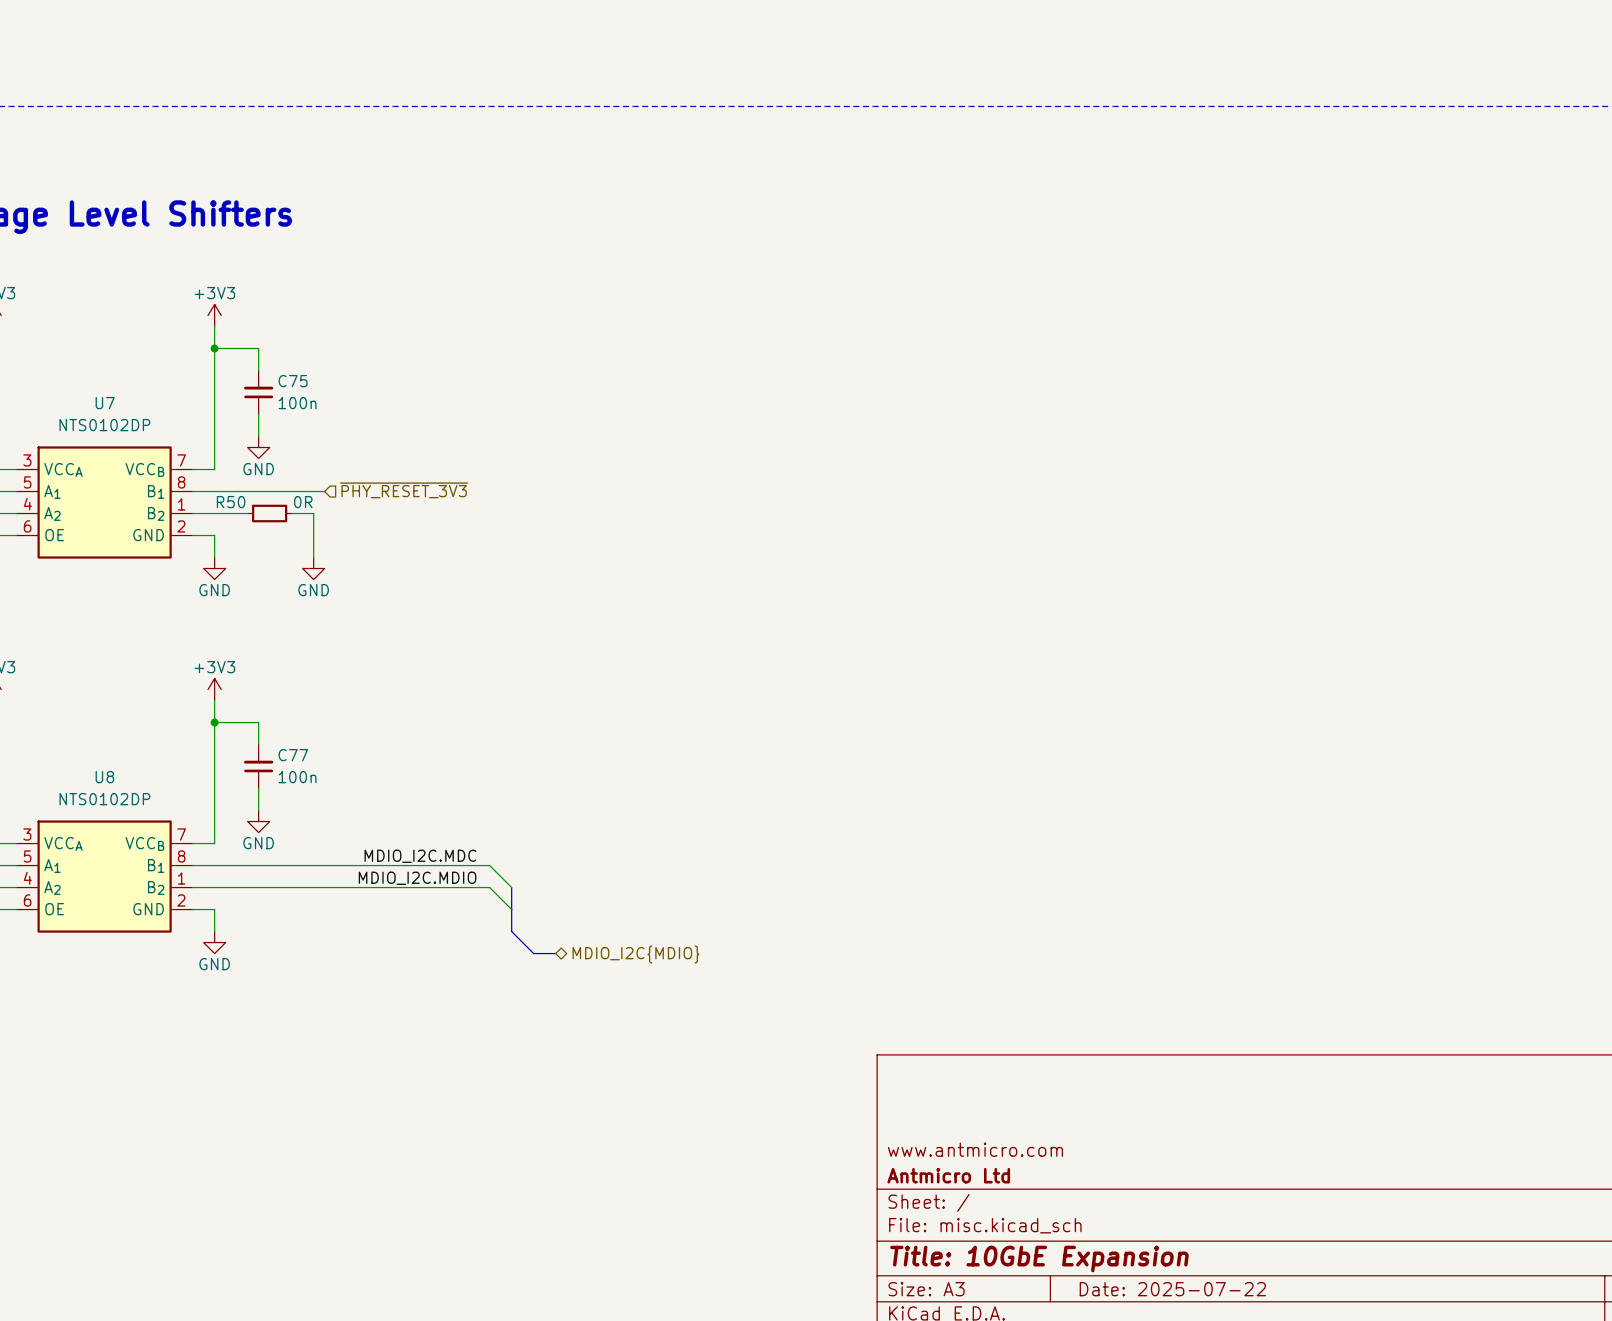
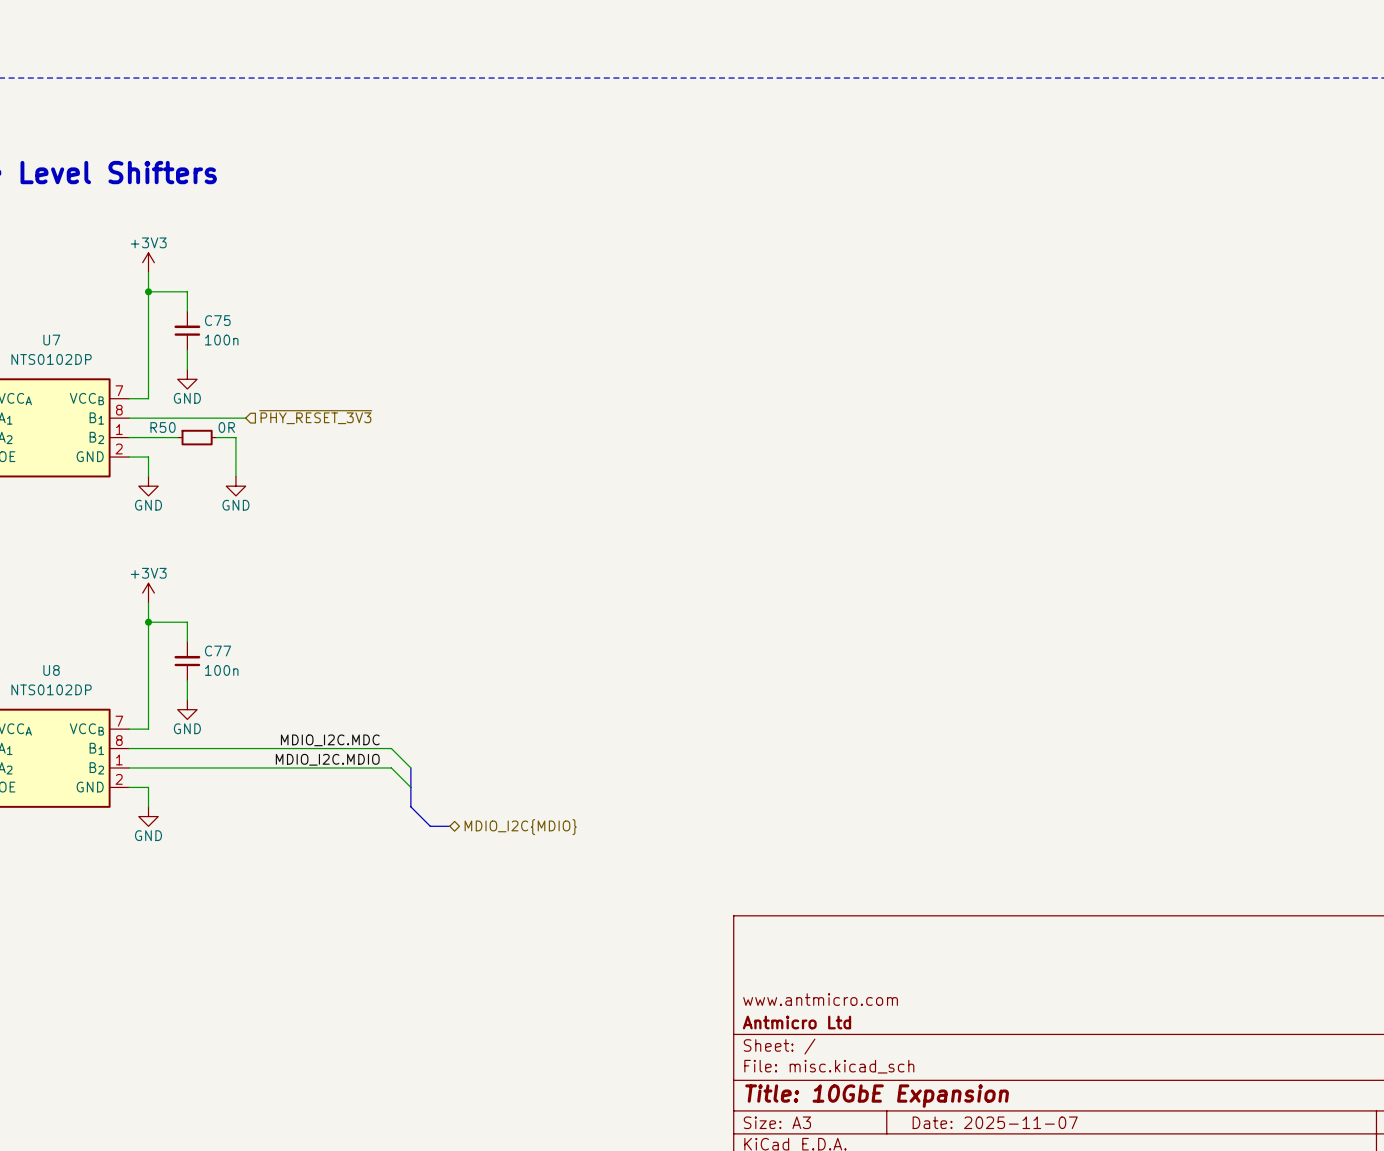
title block: Date: 2025-07-22 (1172, 1289) -> Date: 2025-11-07 (995, 1122)

